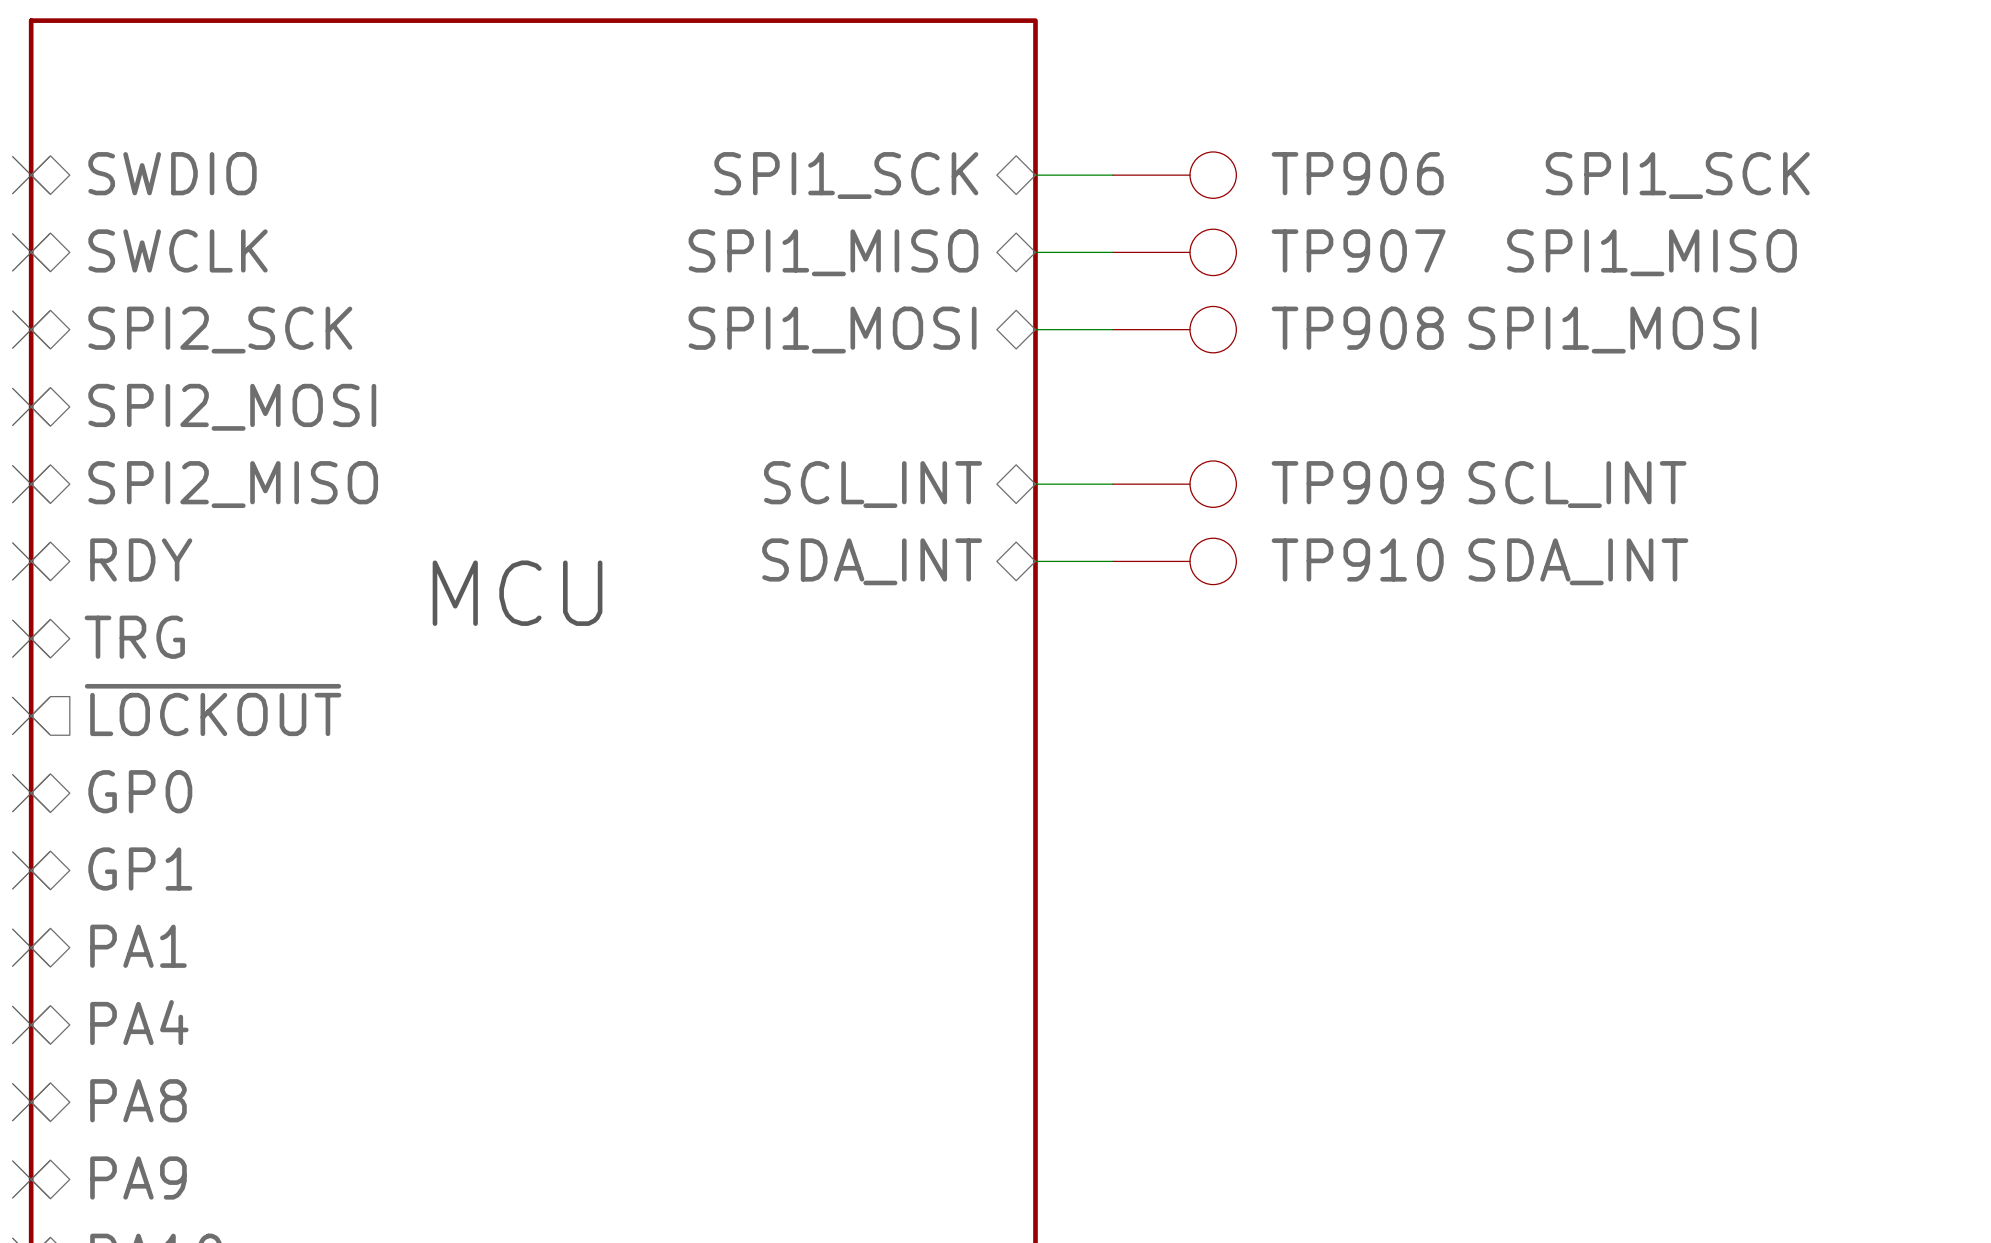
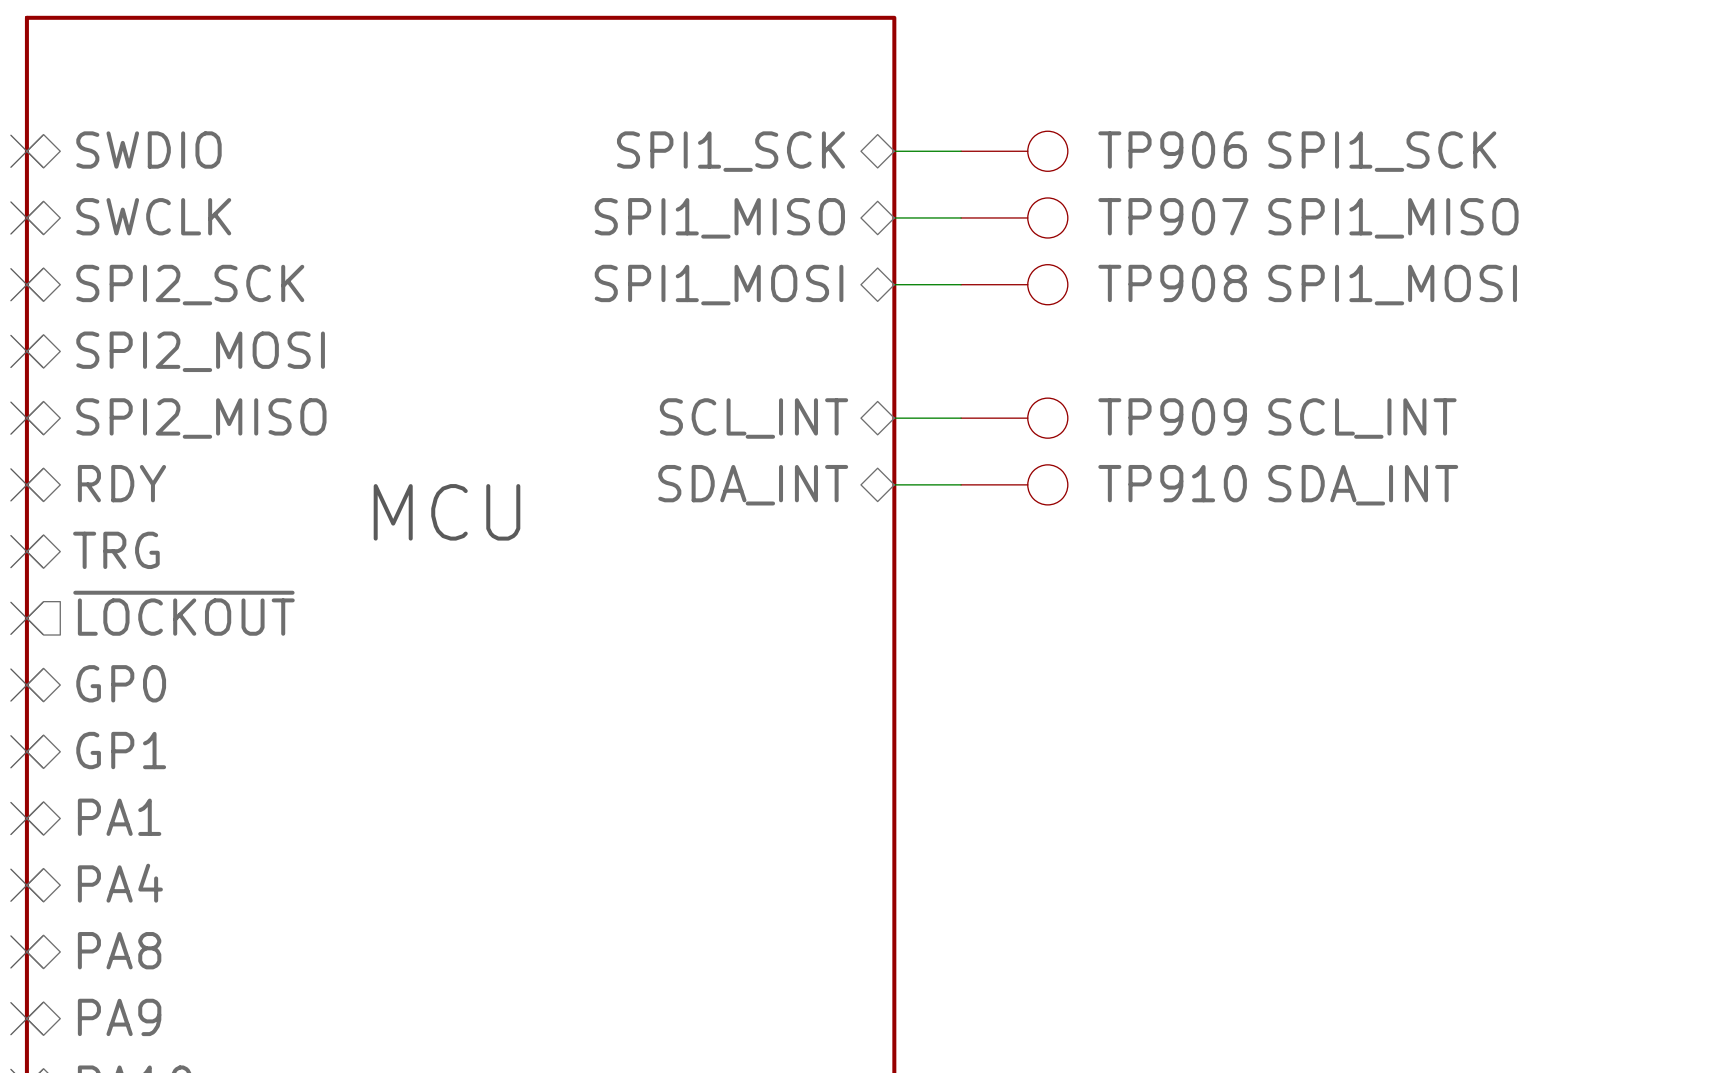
TP906 value position: SPI1_SCK (1677, 175) -> SPI1_SCK (1382, 151)
TP907 value position: SPI1_MISO (1651, 252) -> SPI1_MISO (1393, 218)

